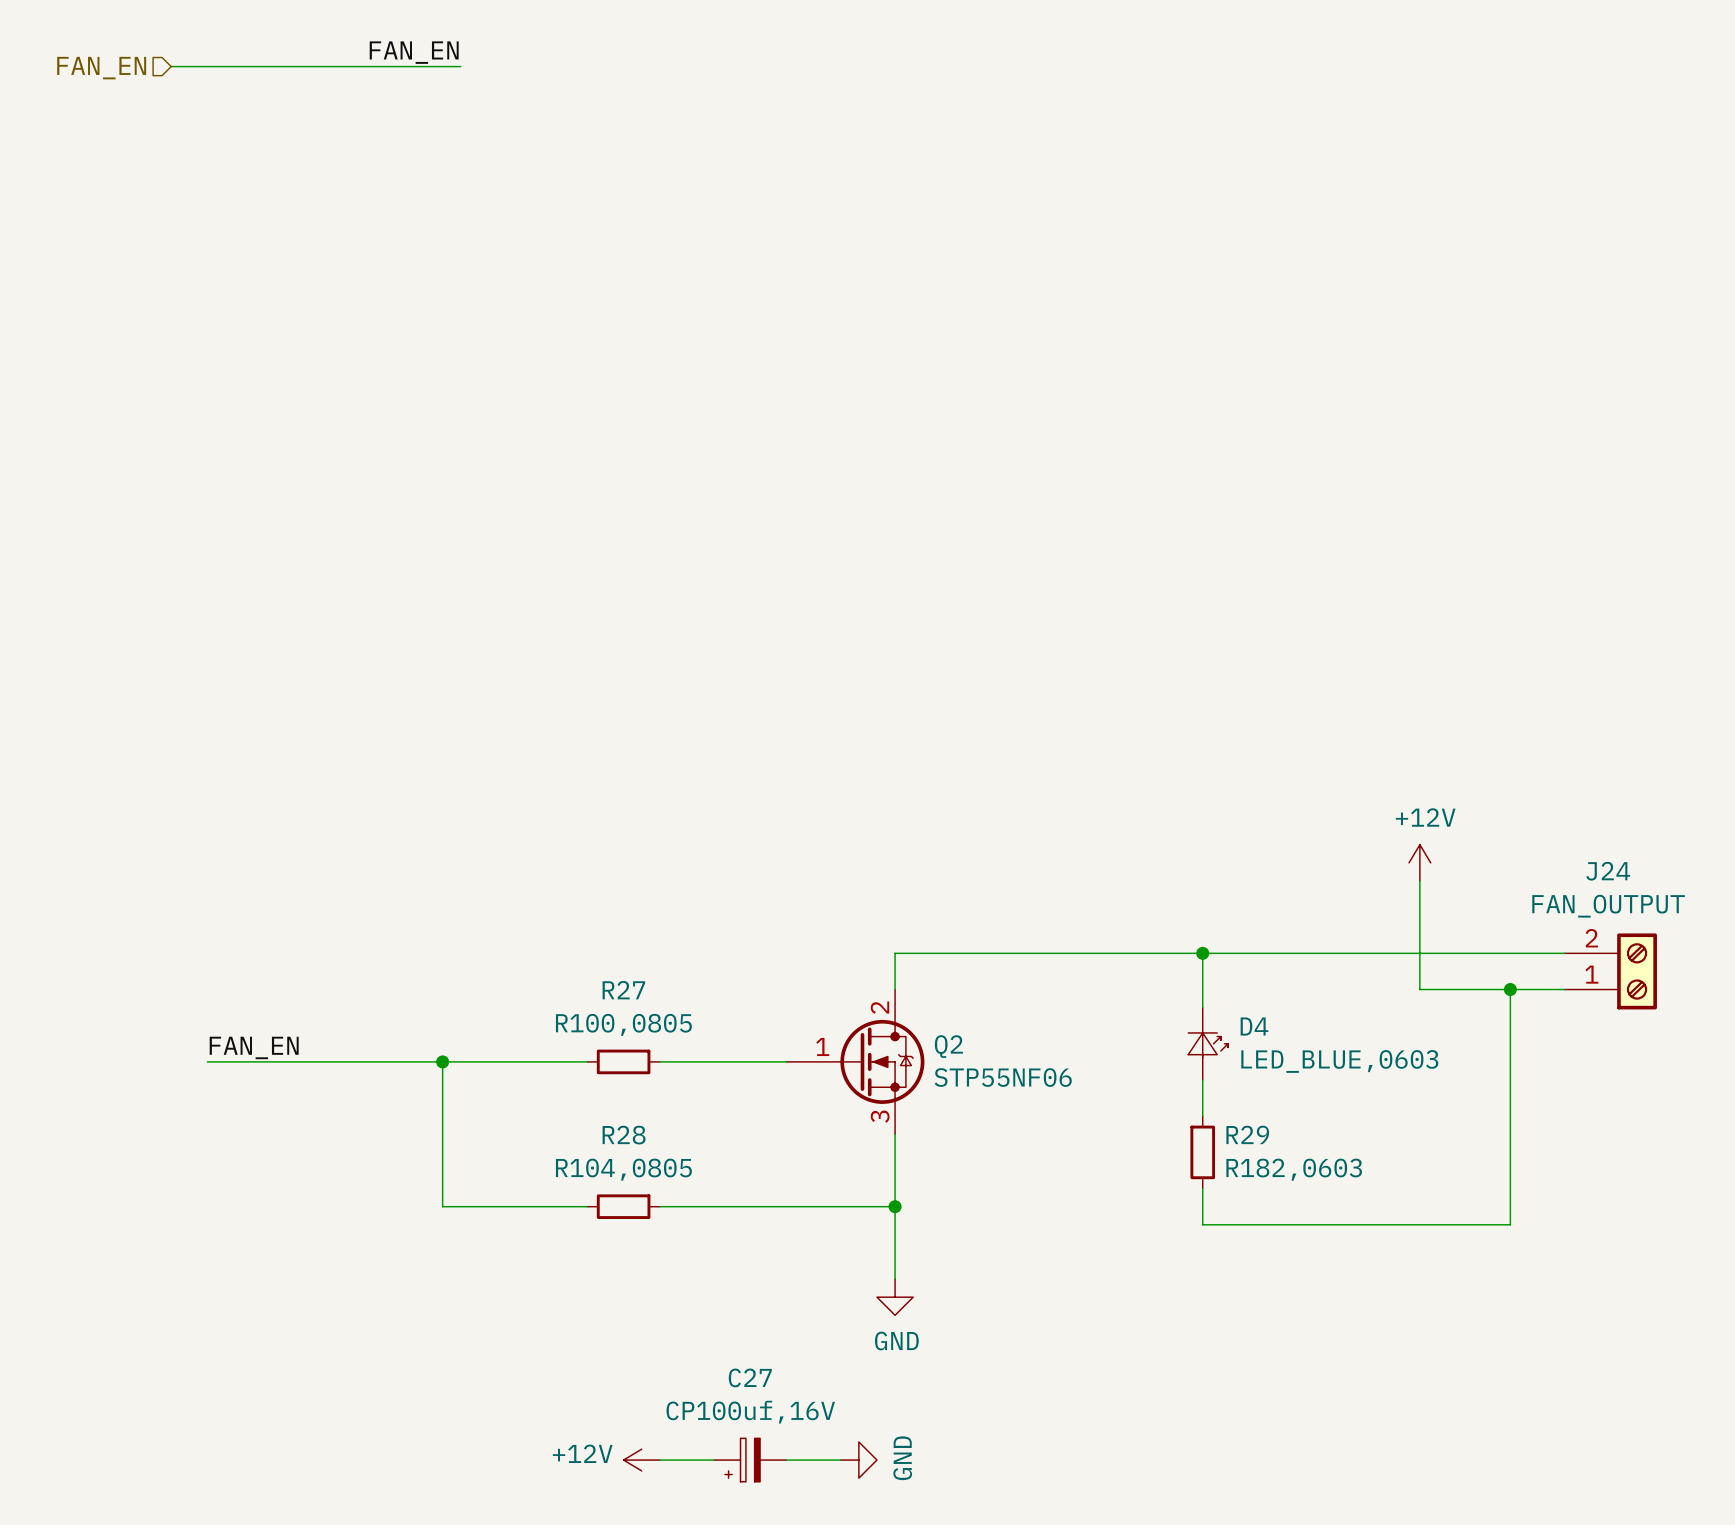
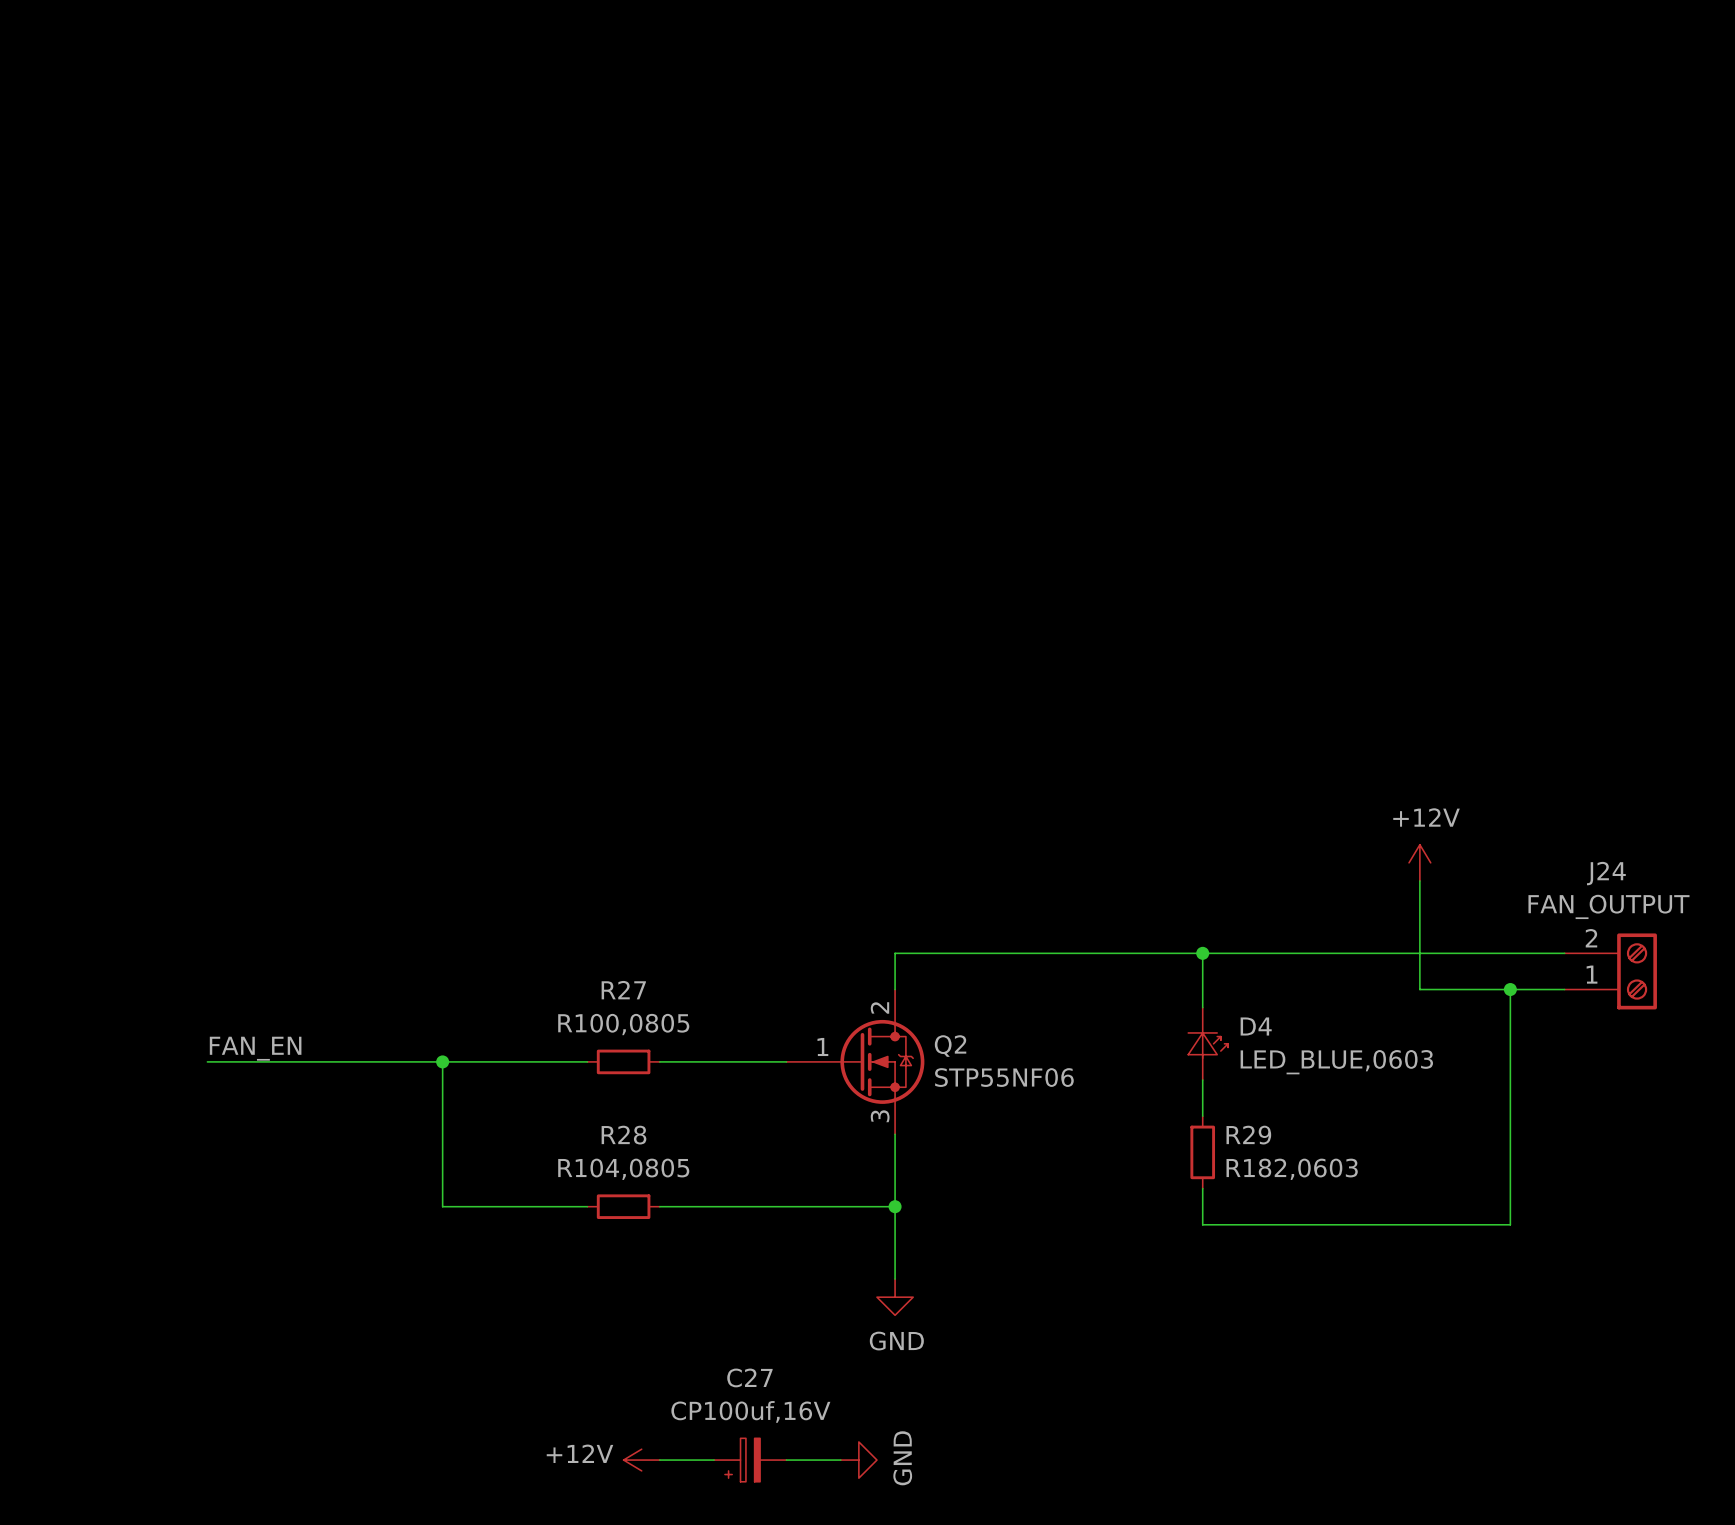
label: FAN_EN (414, 52) -> none
wire: (171, 66) (460, 66) -> none
hierarchical label: FAN_EN (101, 68) -> none

